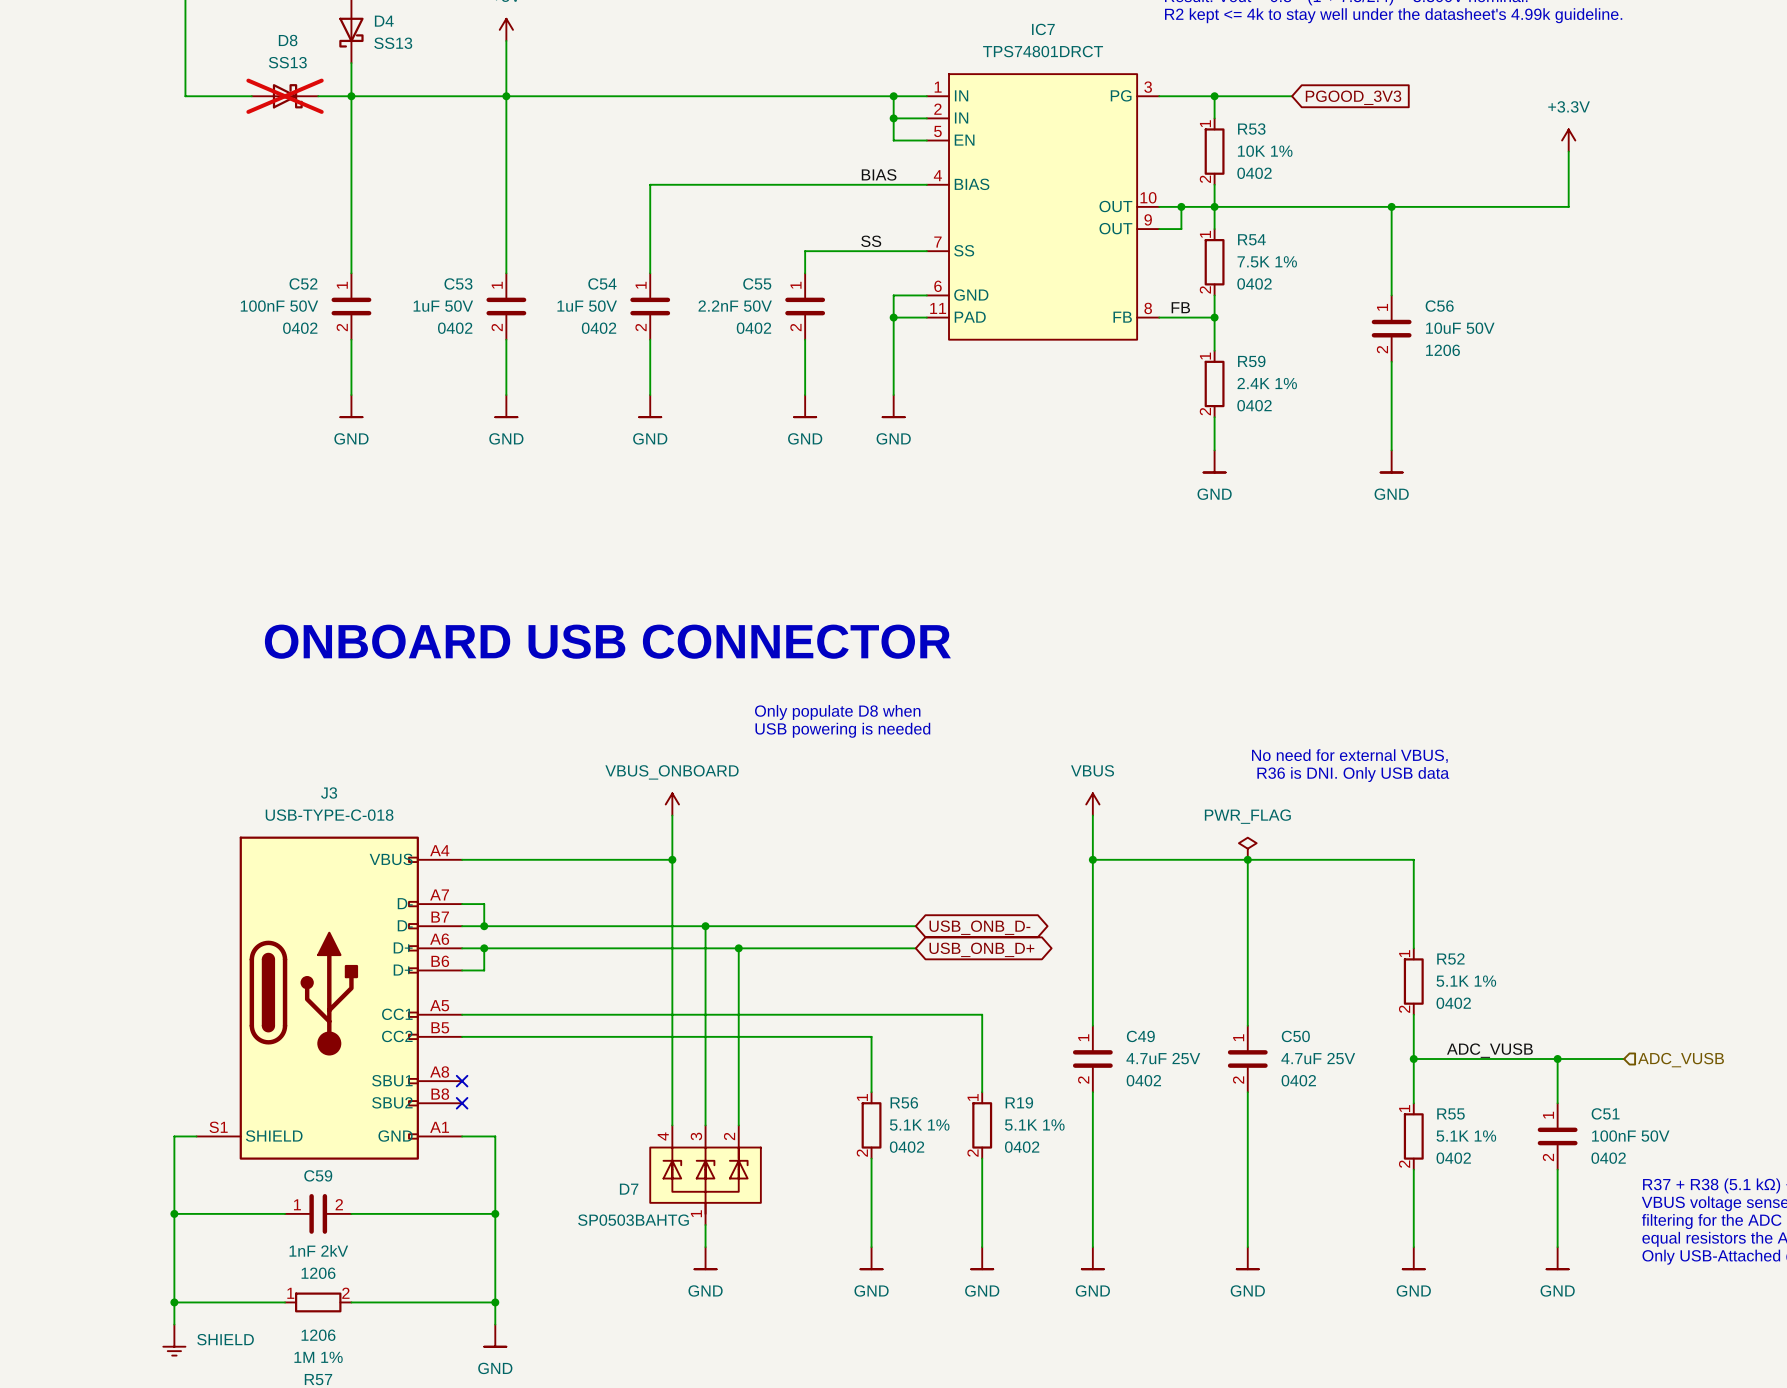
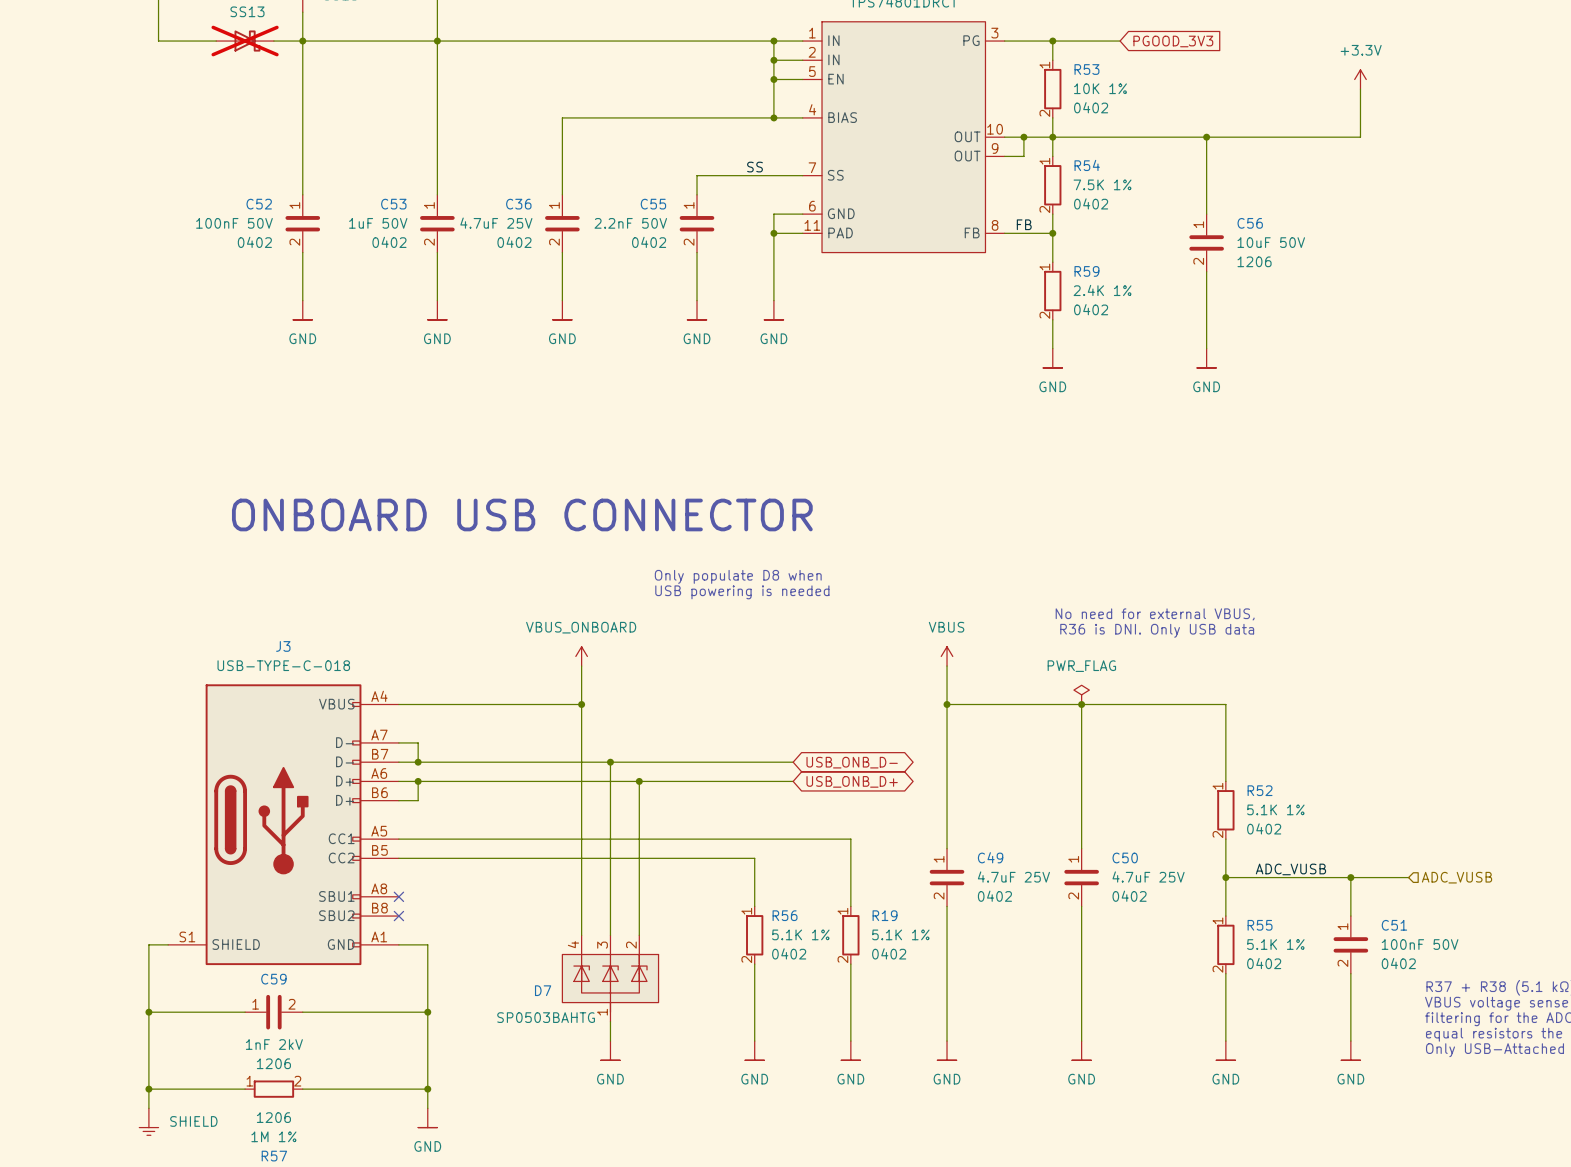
wire: none -> (773, 79) (773, 117)
junction: none -> (773, 79)
label: BIAS (879, 174) -> none
junction: none -> (773, 117)
C54 name: C54 (602, 283) -> C36 (518, 204)
C54 value: 1uF 50V (587, 306) -> 4.7uF 25V (496, 223)

